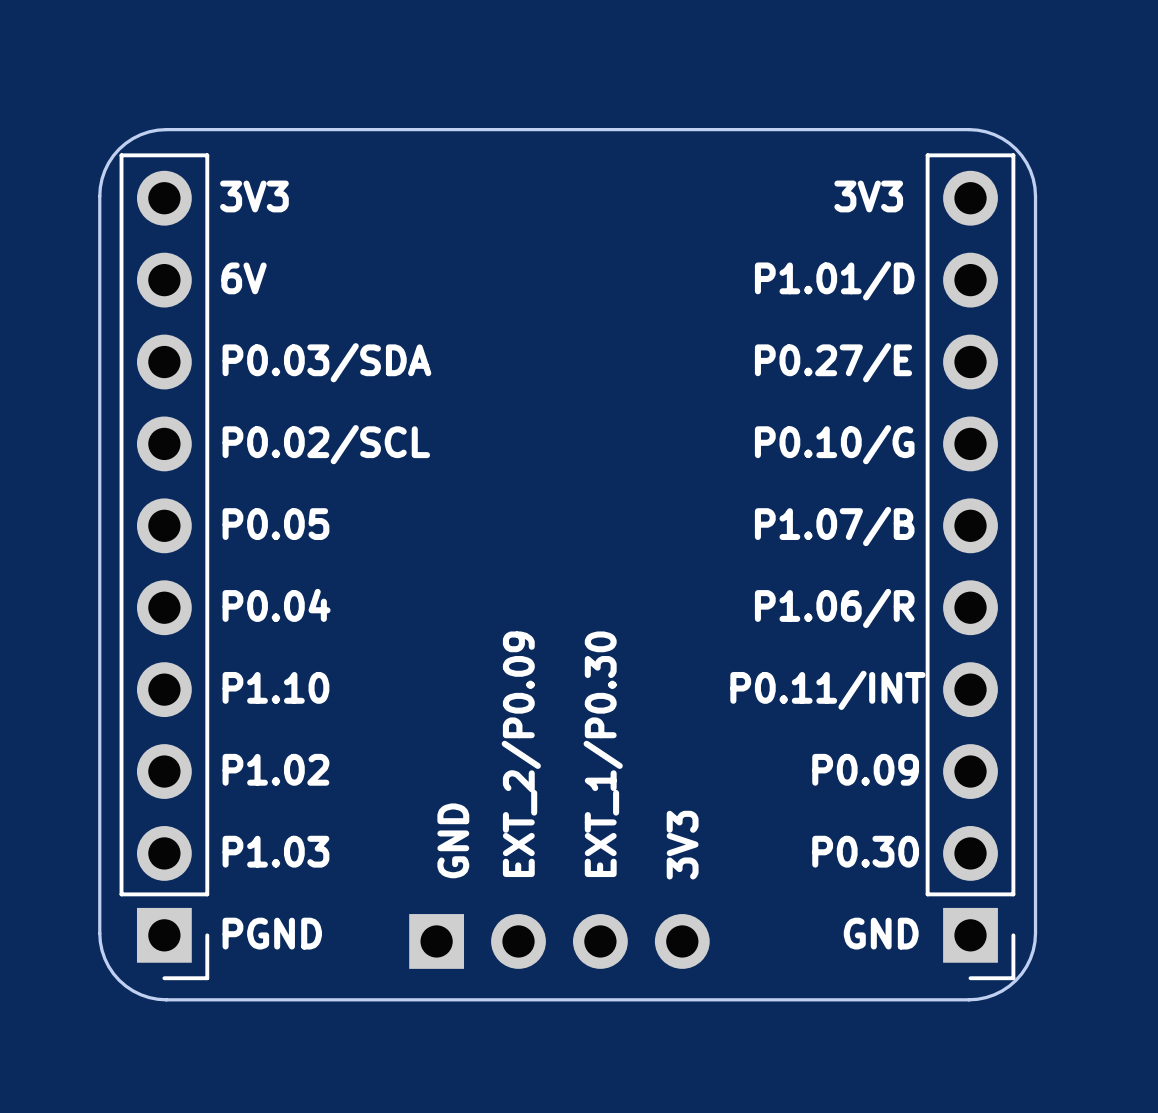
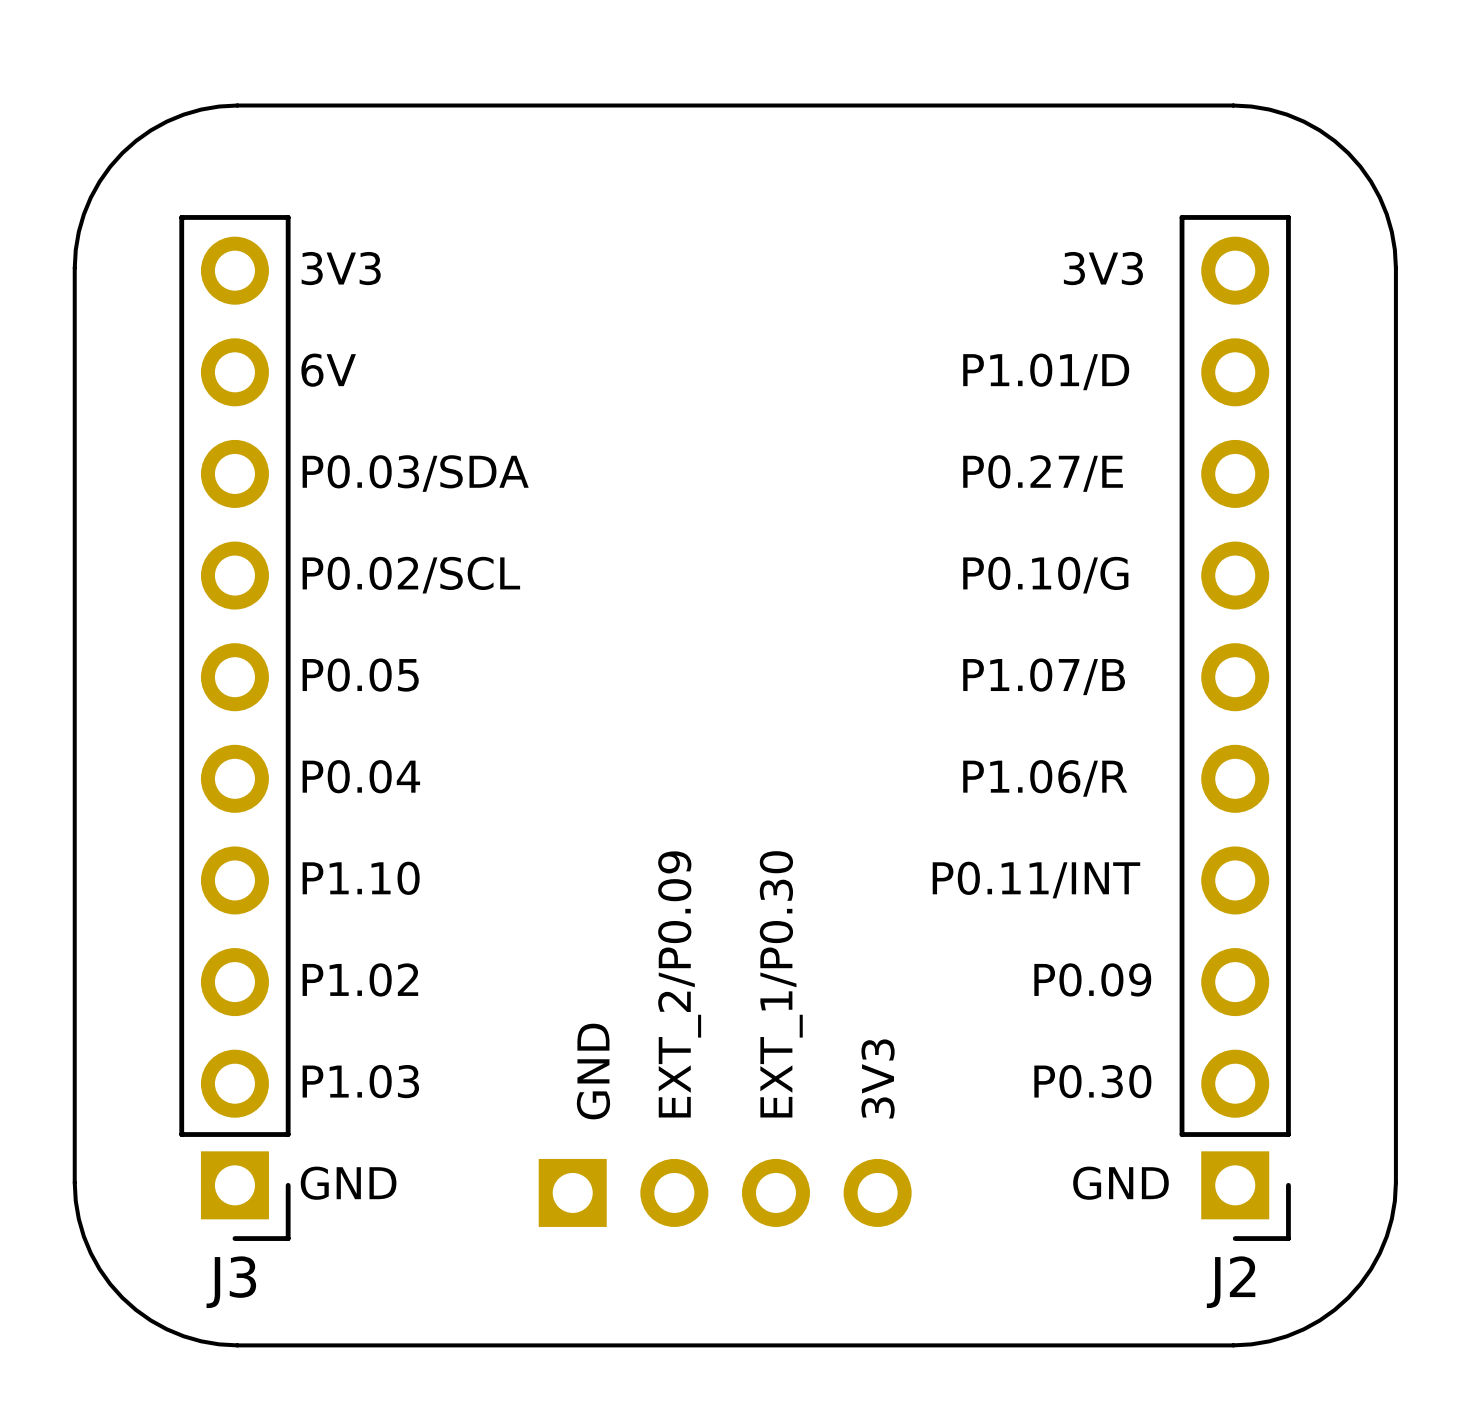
board edge: (968, 129) (166, 129) (140, 134) (119, 149) (104, 170) (99, 196) (99, 933) (104, 958) (119, 980) (140, 994) (166, 999) (968, 999) (994, 994) (1016, 980) (1030, 958) (1035, 933) (1035, 196) (1030, 170) (1016, 149) (994, 134) (968, 129) -> (1233, 105) (1269, 109) (1303, 121) (1319, 130) (1348, 153) (1360, 166) (1379, 197) (1386, 214) (1394, 249) (1395, 1182) (1391, 1218) (1379, 1253) (1371, 1269) (1348, 1297) (1334, 1309) (1303, 1329) (1269, 1341) (1233, 1345) (237, 1345) (201, 1341) (166, 1329) (150, 1320) (122, 1297) (99, 1269) (83, 1236) (78, 1218) (74, 1182) (74, 268) (78, 231) (90, 197) (110, 166) (122, 153) (150, 130) (183, 114) (201, 109) (237, 105) (1233, 105)
text: PGND (272, 933) -> GND (348, 1183)
J3 name: none -> J3 (231, 1282)
J2 name: none -> J2 (1231, 1282)

